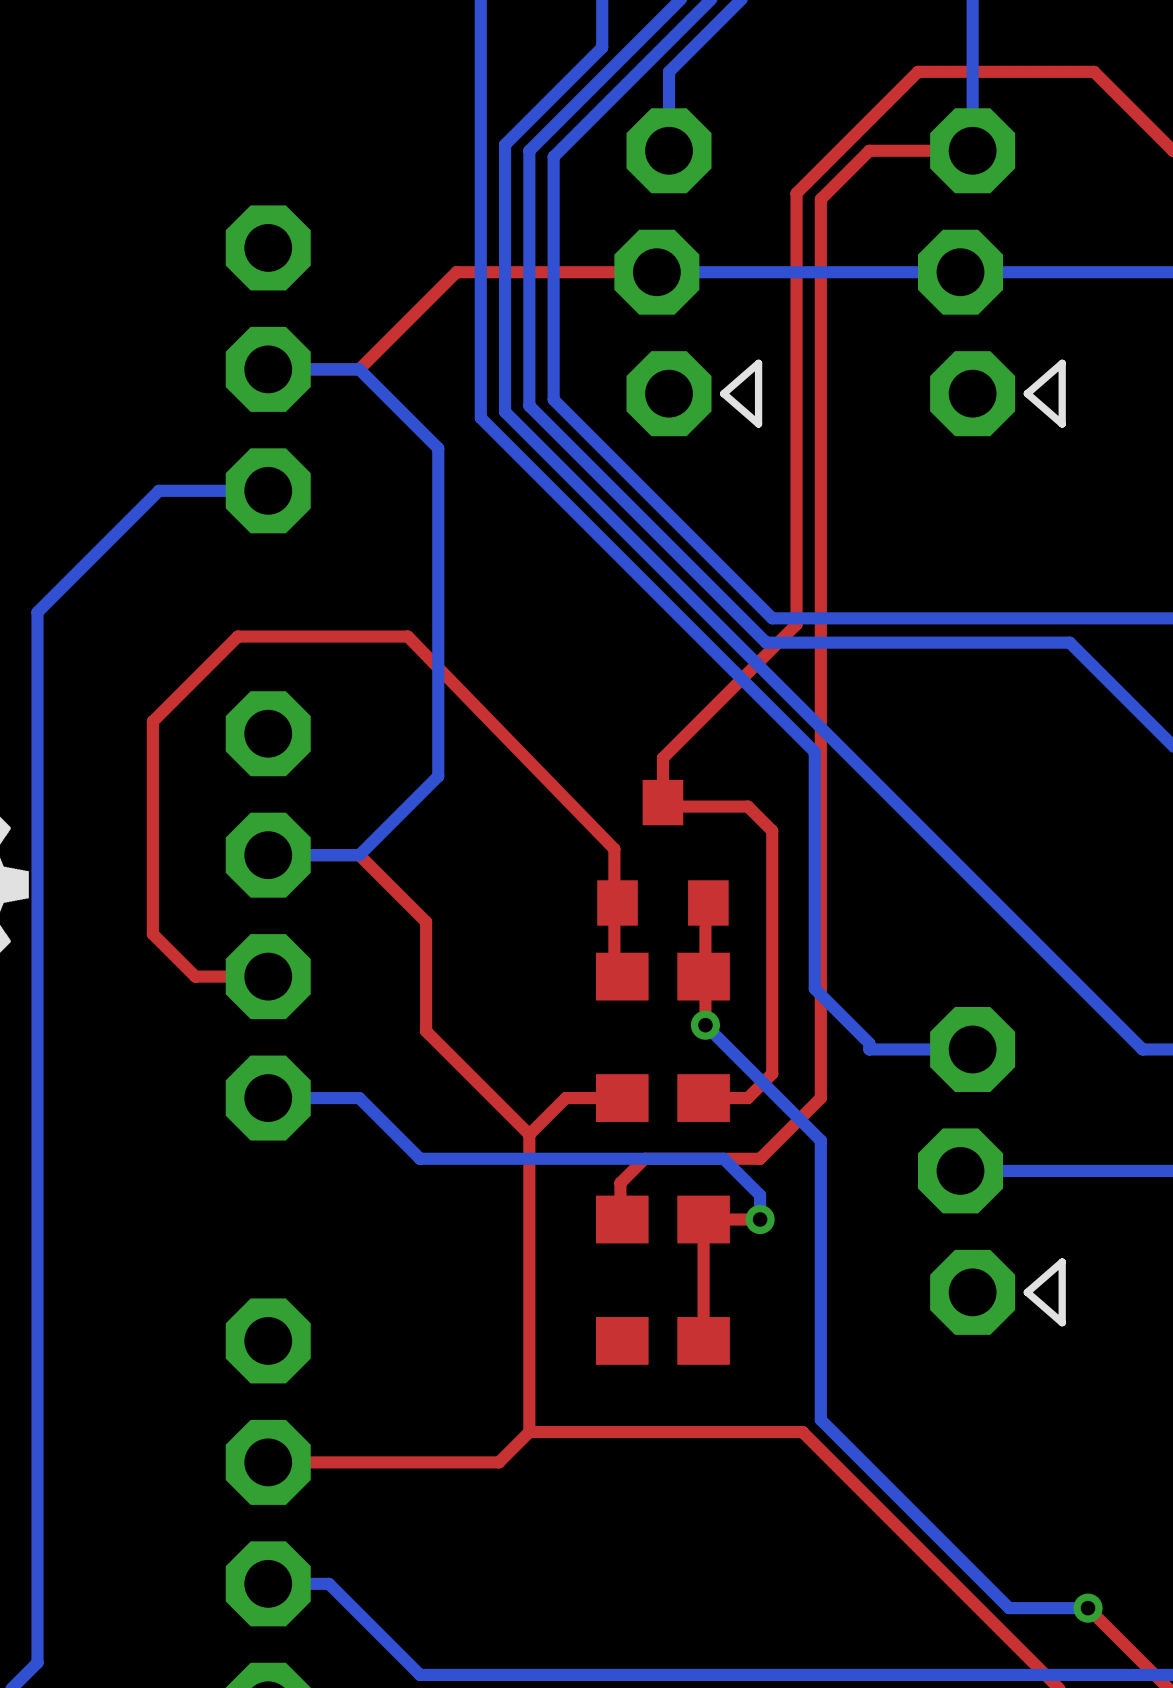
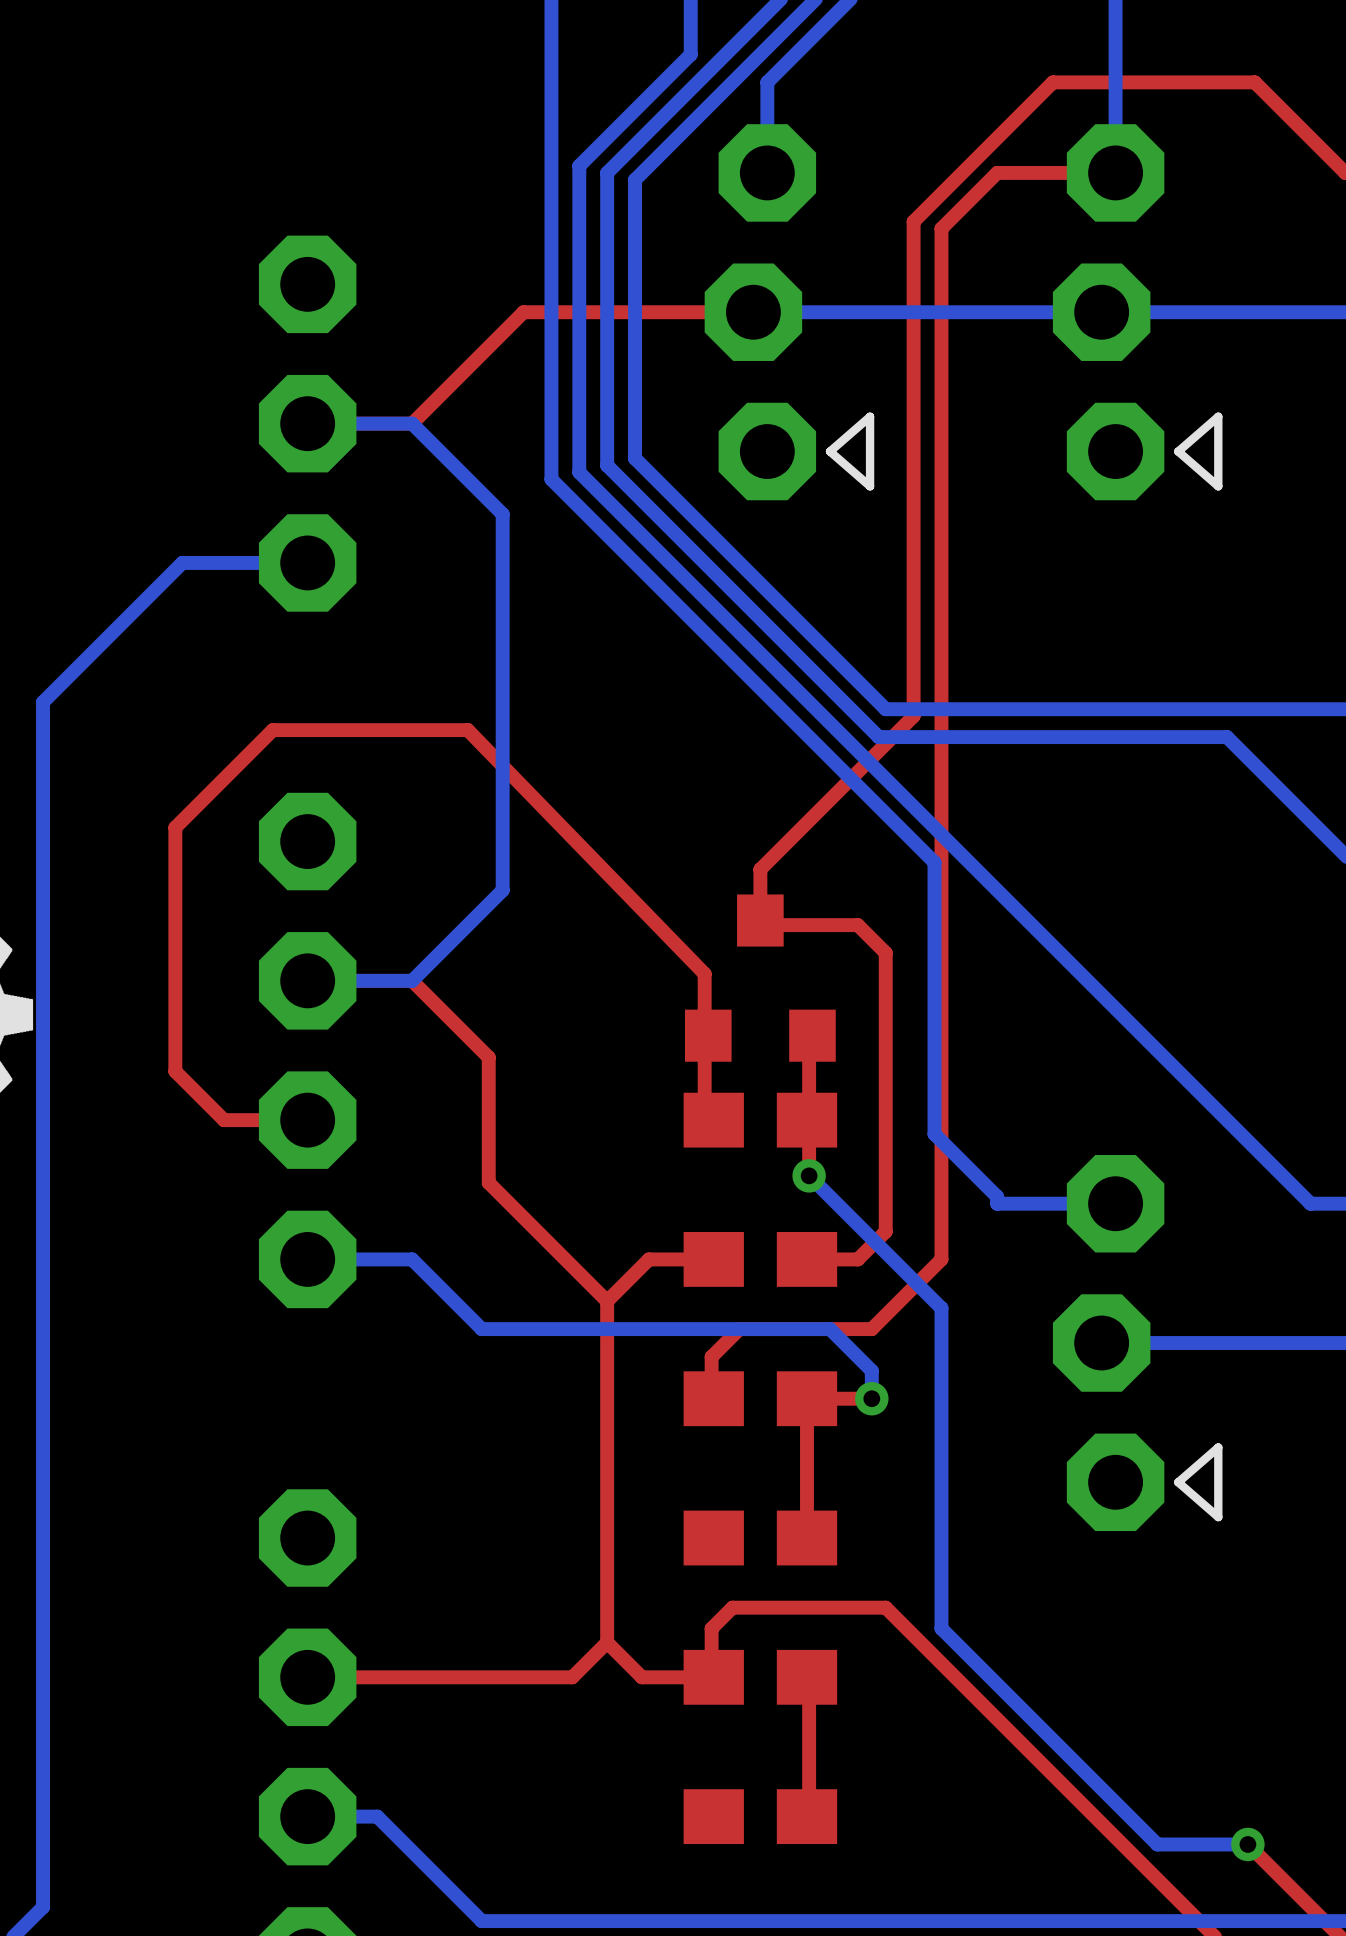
top track: (802, 1432) (529, 1432) -> (920, 1642) (885, 1607) (732, 1607) (711, 1628) (711, 1675) (713, 1677) (641, 1677) (607, 1642)
part: none -> (760, 1677)
top track: none -> (806, 1677) (809, 1679) (809, 1814) (806, 1816)
part: none -> (760, 1816)

